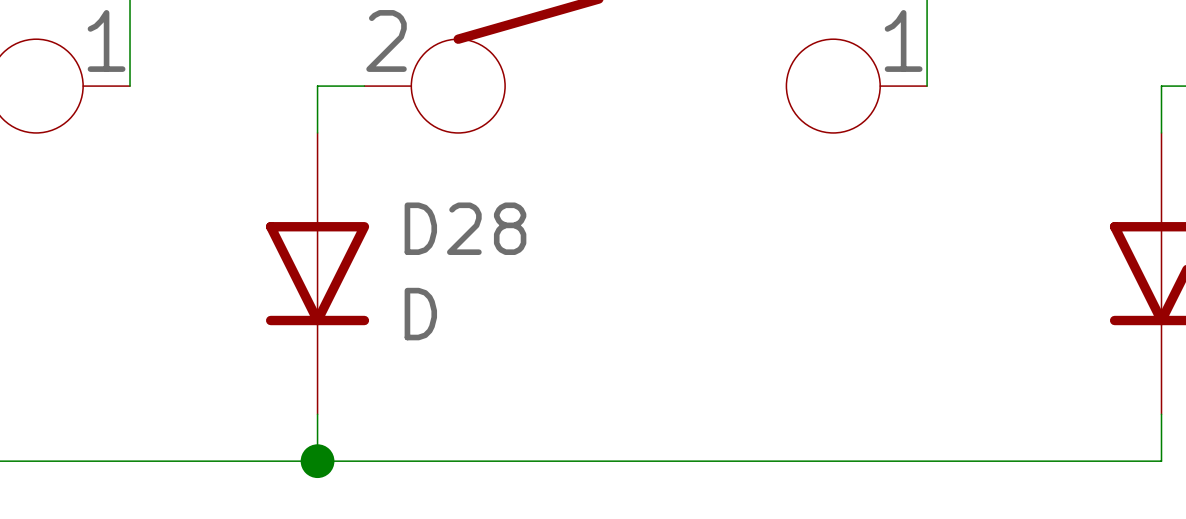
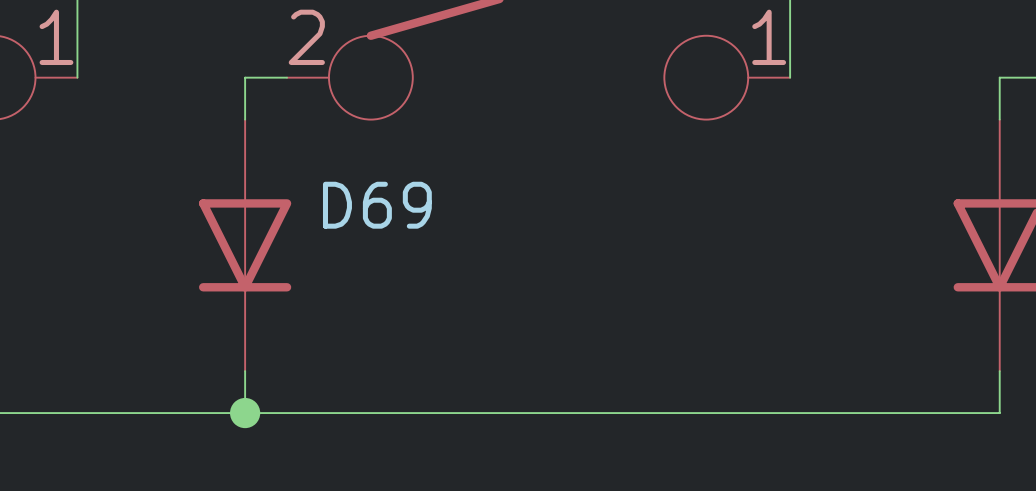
D28 name: D28 (465, 228) -> D69 (377, 205)
D28 value: D (420, 314) -> none

